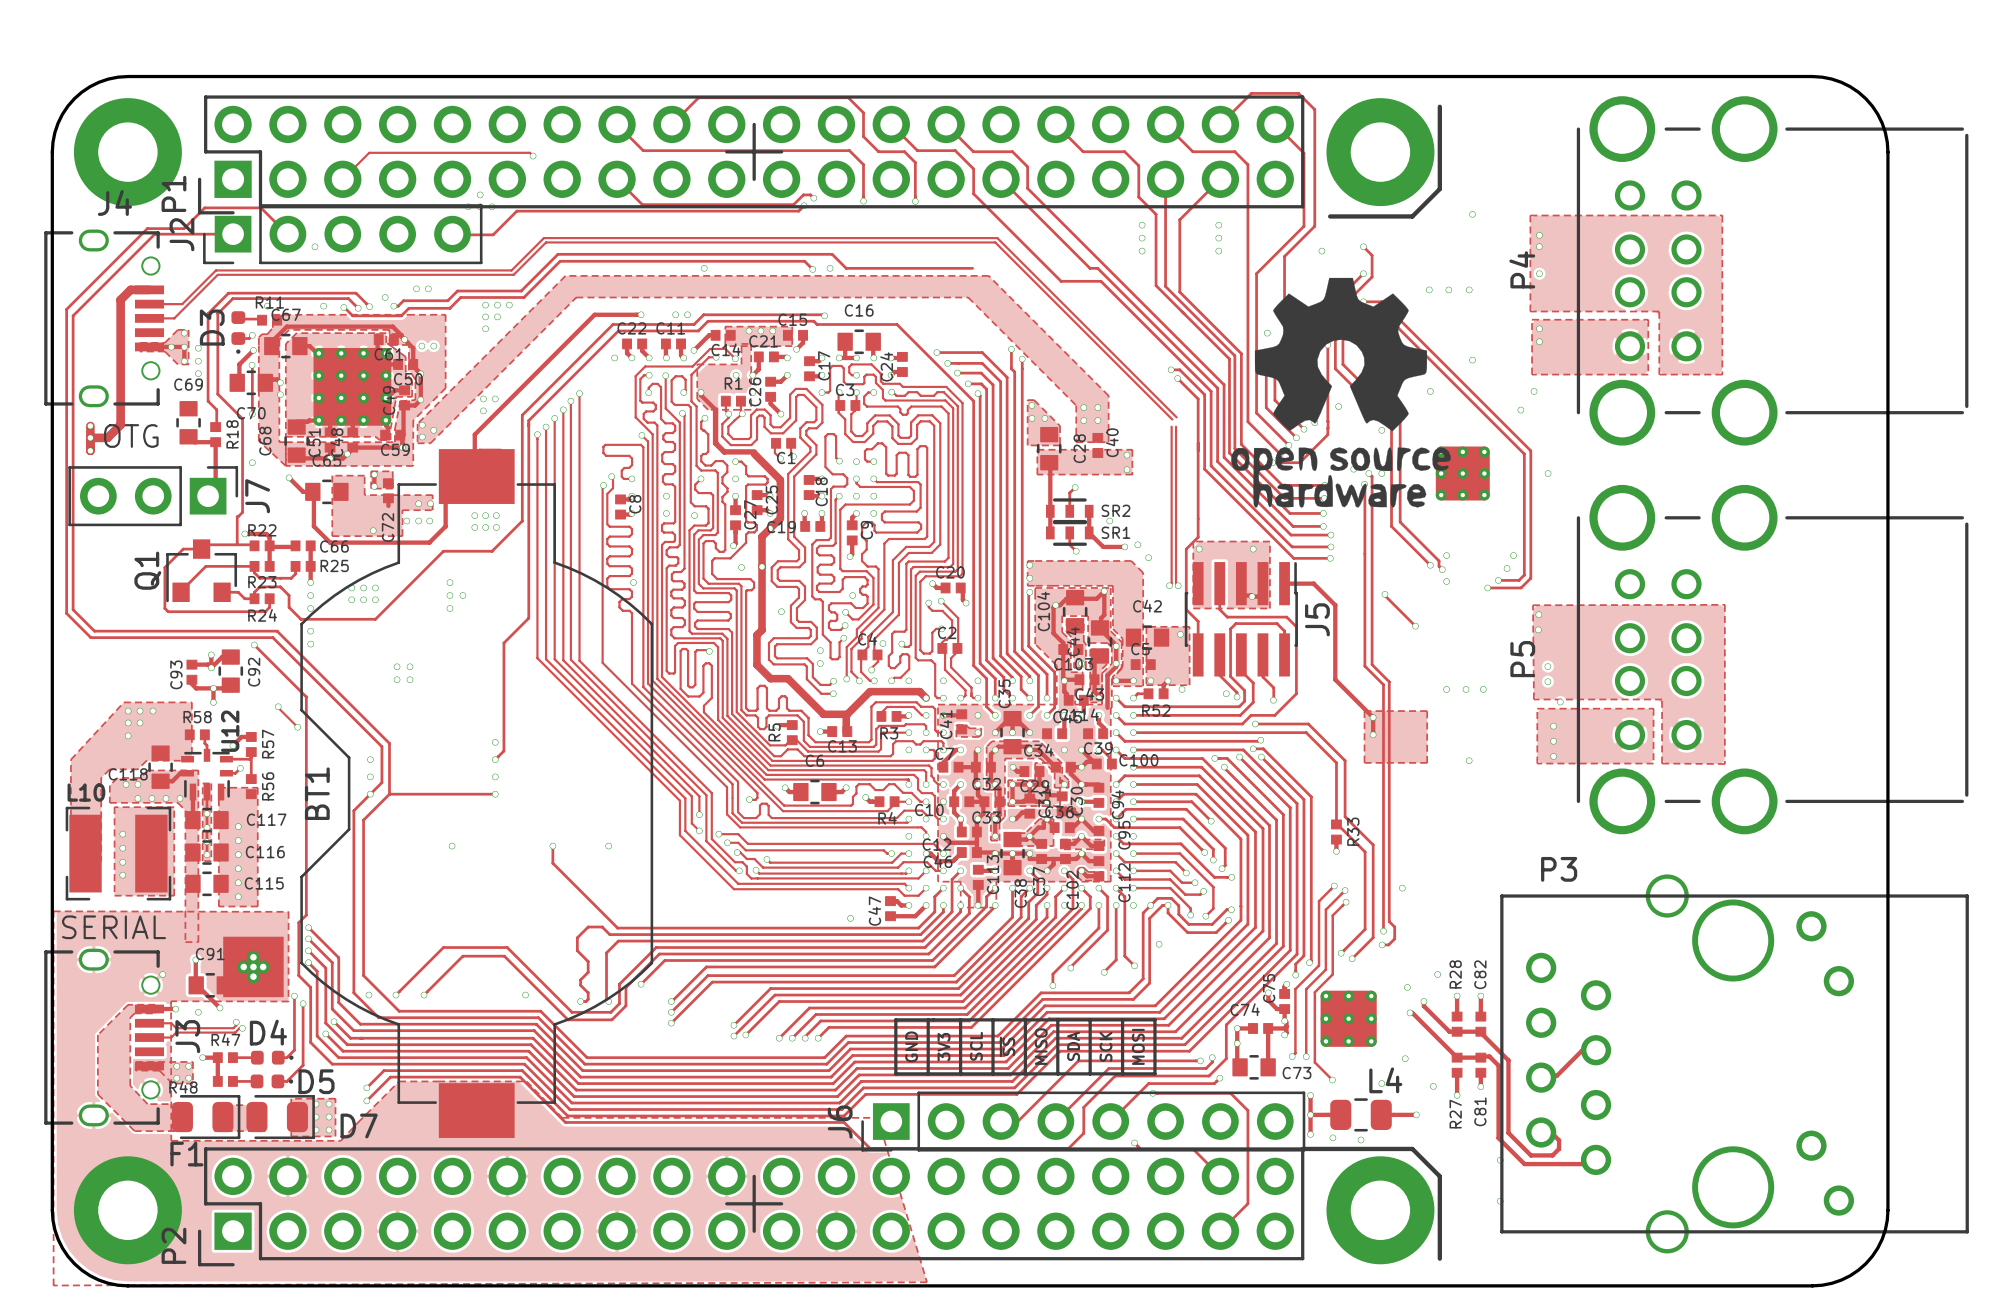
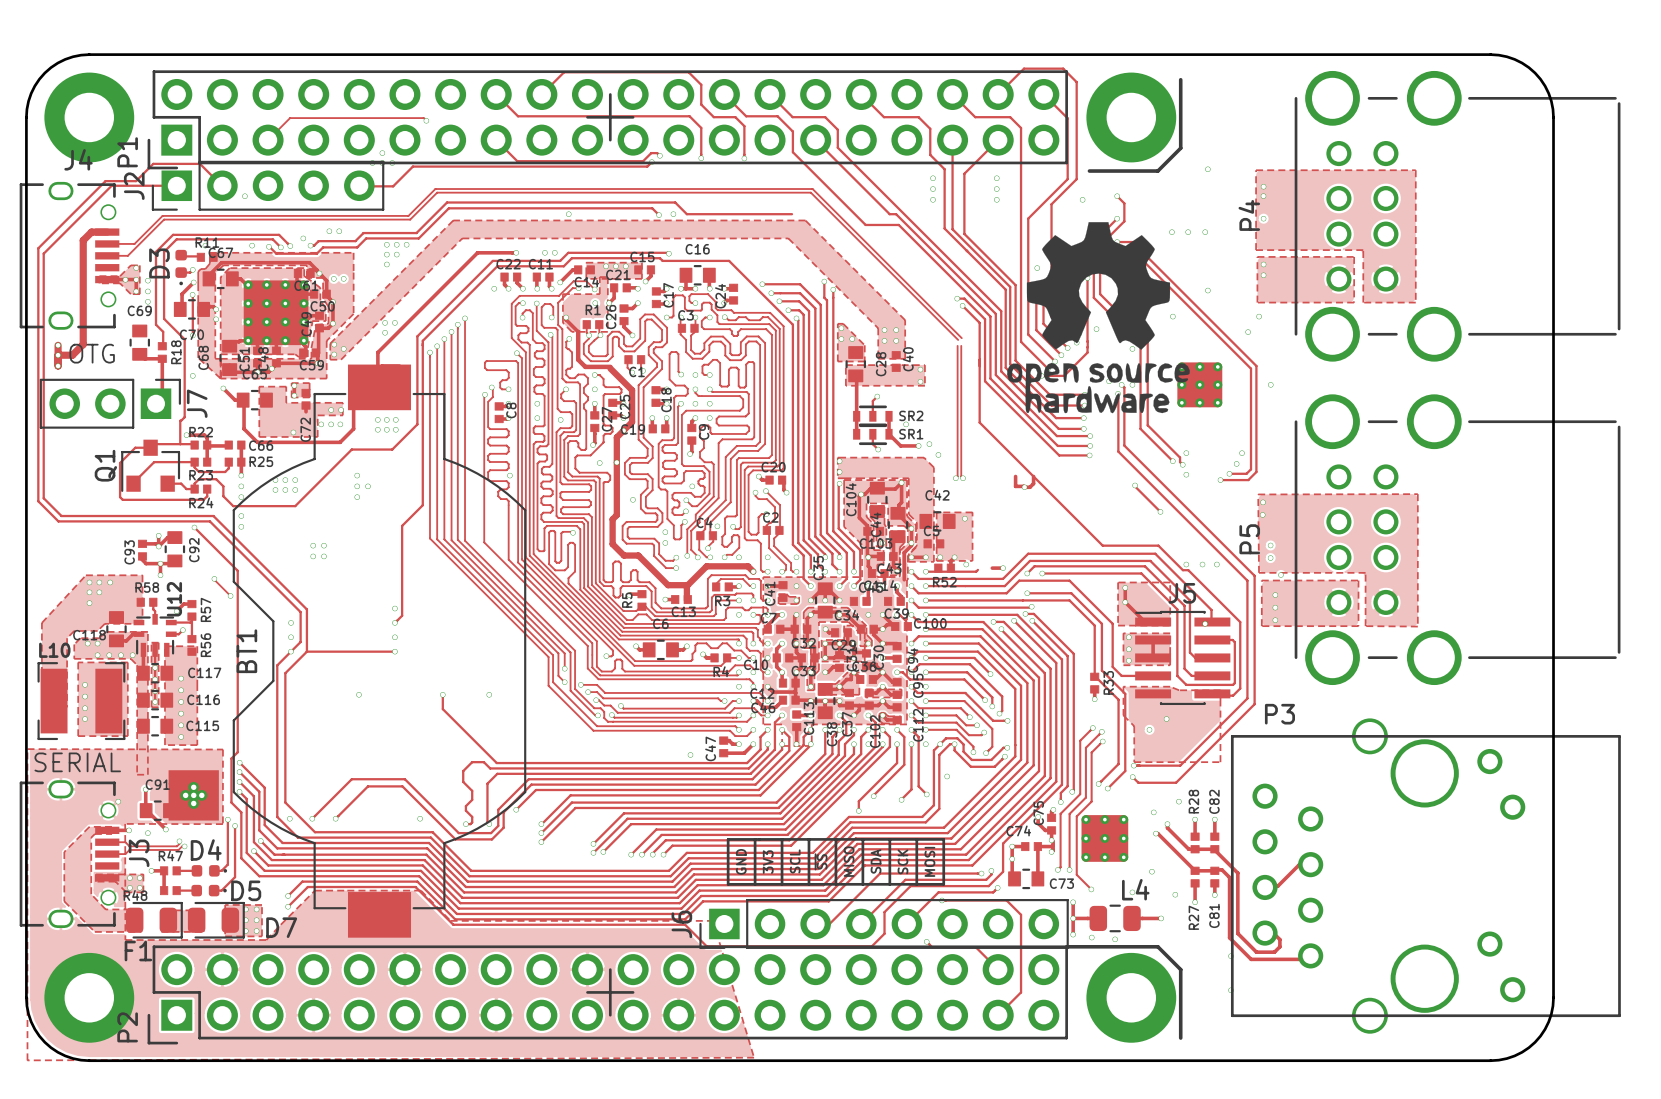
track: (1198, 518) (1198, 537) (1186, 549) (1186, 609) (1198, 621) (1198, 654) -> (979, 422) (1102, 545) (1158, 545) (1182, 570) (1188, 570) (1240, 622) (1240, 688) (1233, 695) (1211, 695)
zone outline: (1193, 541) (1193, 608) (1269, 608) (1269, 541) (1193, 541) -> none
track: (1372, 546) (1372, 664) (1389, 681) (1389, 921) (1394, 927) (1394, 938) (1388, 944) (1382, 944) -> (1124, 445) (1254, 575) (1254, 704) (1176, 782) (1138, 782) (1132, 777)
via: (1199, 549) -> none
via: (1253, 549) -> none
track: (1364, 553) (1364, 666) (1383, 684) (1383, 931) -> (1118, 451) (1247, 580) (1247, 698) (1180, 765) (1133, 765)
track: (1219, 583) (1219, 609) (1227, 617) (1286, 617) (1296, 626) (1296, 693) (1274, 715) (1251, 715) (1242, 724) (1230, 724) -> (1153, 675) (1121, 675) (1112, 666) (1112, 623) (1069, 580) (1019, 580) (1006, 593)
track: (1284, 583) (1313, 583) (1335, 605) (1335, 679) (1373, 717) -> none
J5 rotation: 0° (1241, 619) -> 90° counterclockwise (1182, 657)
J5 position: (1241, 619) -> (1182, 657)
track: (1219, 654) (1219, 675) (1237, 692) (1237, 697) -> none
track: (1241, 654) (1241, 671) (1253, 682) (1253, 702) (1240, 715) (1228, 715) -> (1212, 657) (1195, 657) (1189, 652) (1189, 600) (1150, 560) (1029, 560) (1004, 586)
track: (1262, 654) (1262, 677) (1273, 687) (1273, 700) -> (1212, 639) (1232, 639) (1234, 642) (1234, 683) (1233, 684) (1186, 684) (1177, 675) (1177, 609) (1141, 573) (1042, 573)
track: (1284, 654) (1284, 631) (1276, 623) (1235, 623) (1230, 629) (1230, 676) (1244, 690) (1244, 701) (1239, 706) (1226, 706) -> (1211, 620) (1211, 609) (1155, 553) (1028, 553) (1003, 578)
track: (1148, 693) (1137, 693) (1133, 698) -> (977, 569) (976, 571) (925, 571)
track: none -> (992, 568) (1003, 568)
via position: (1237, 697) -> (1027, 573)
track: none -> (1027, 573) (1034, 566) (1145, 566) (1184, 605) (1184, 668) (1191, 675) (1211, 675)
track: none -> (1125, 602) (1145, 622) (1153, 622)
zone outline: none -> (1123, 633) (1170, 633) (1170, 665) (1123, 665) (1123, 633)
via: none -> (1128, 637)
track: none -> (1153, 639) (1154, 657)
via: none -> (1128, 649)
via: none -> (1128, 660)
zone outline: none -> (1123, 686) (1123, 715) (1134, 726) (1134, 762) (1220, 762) (1220, 690) (1179, 690) (1170, 686) (1123, 686)
via: none -> (1166, 719)

